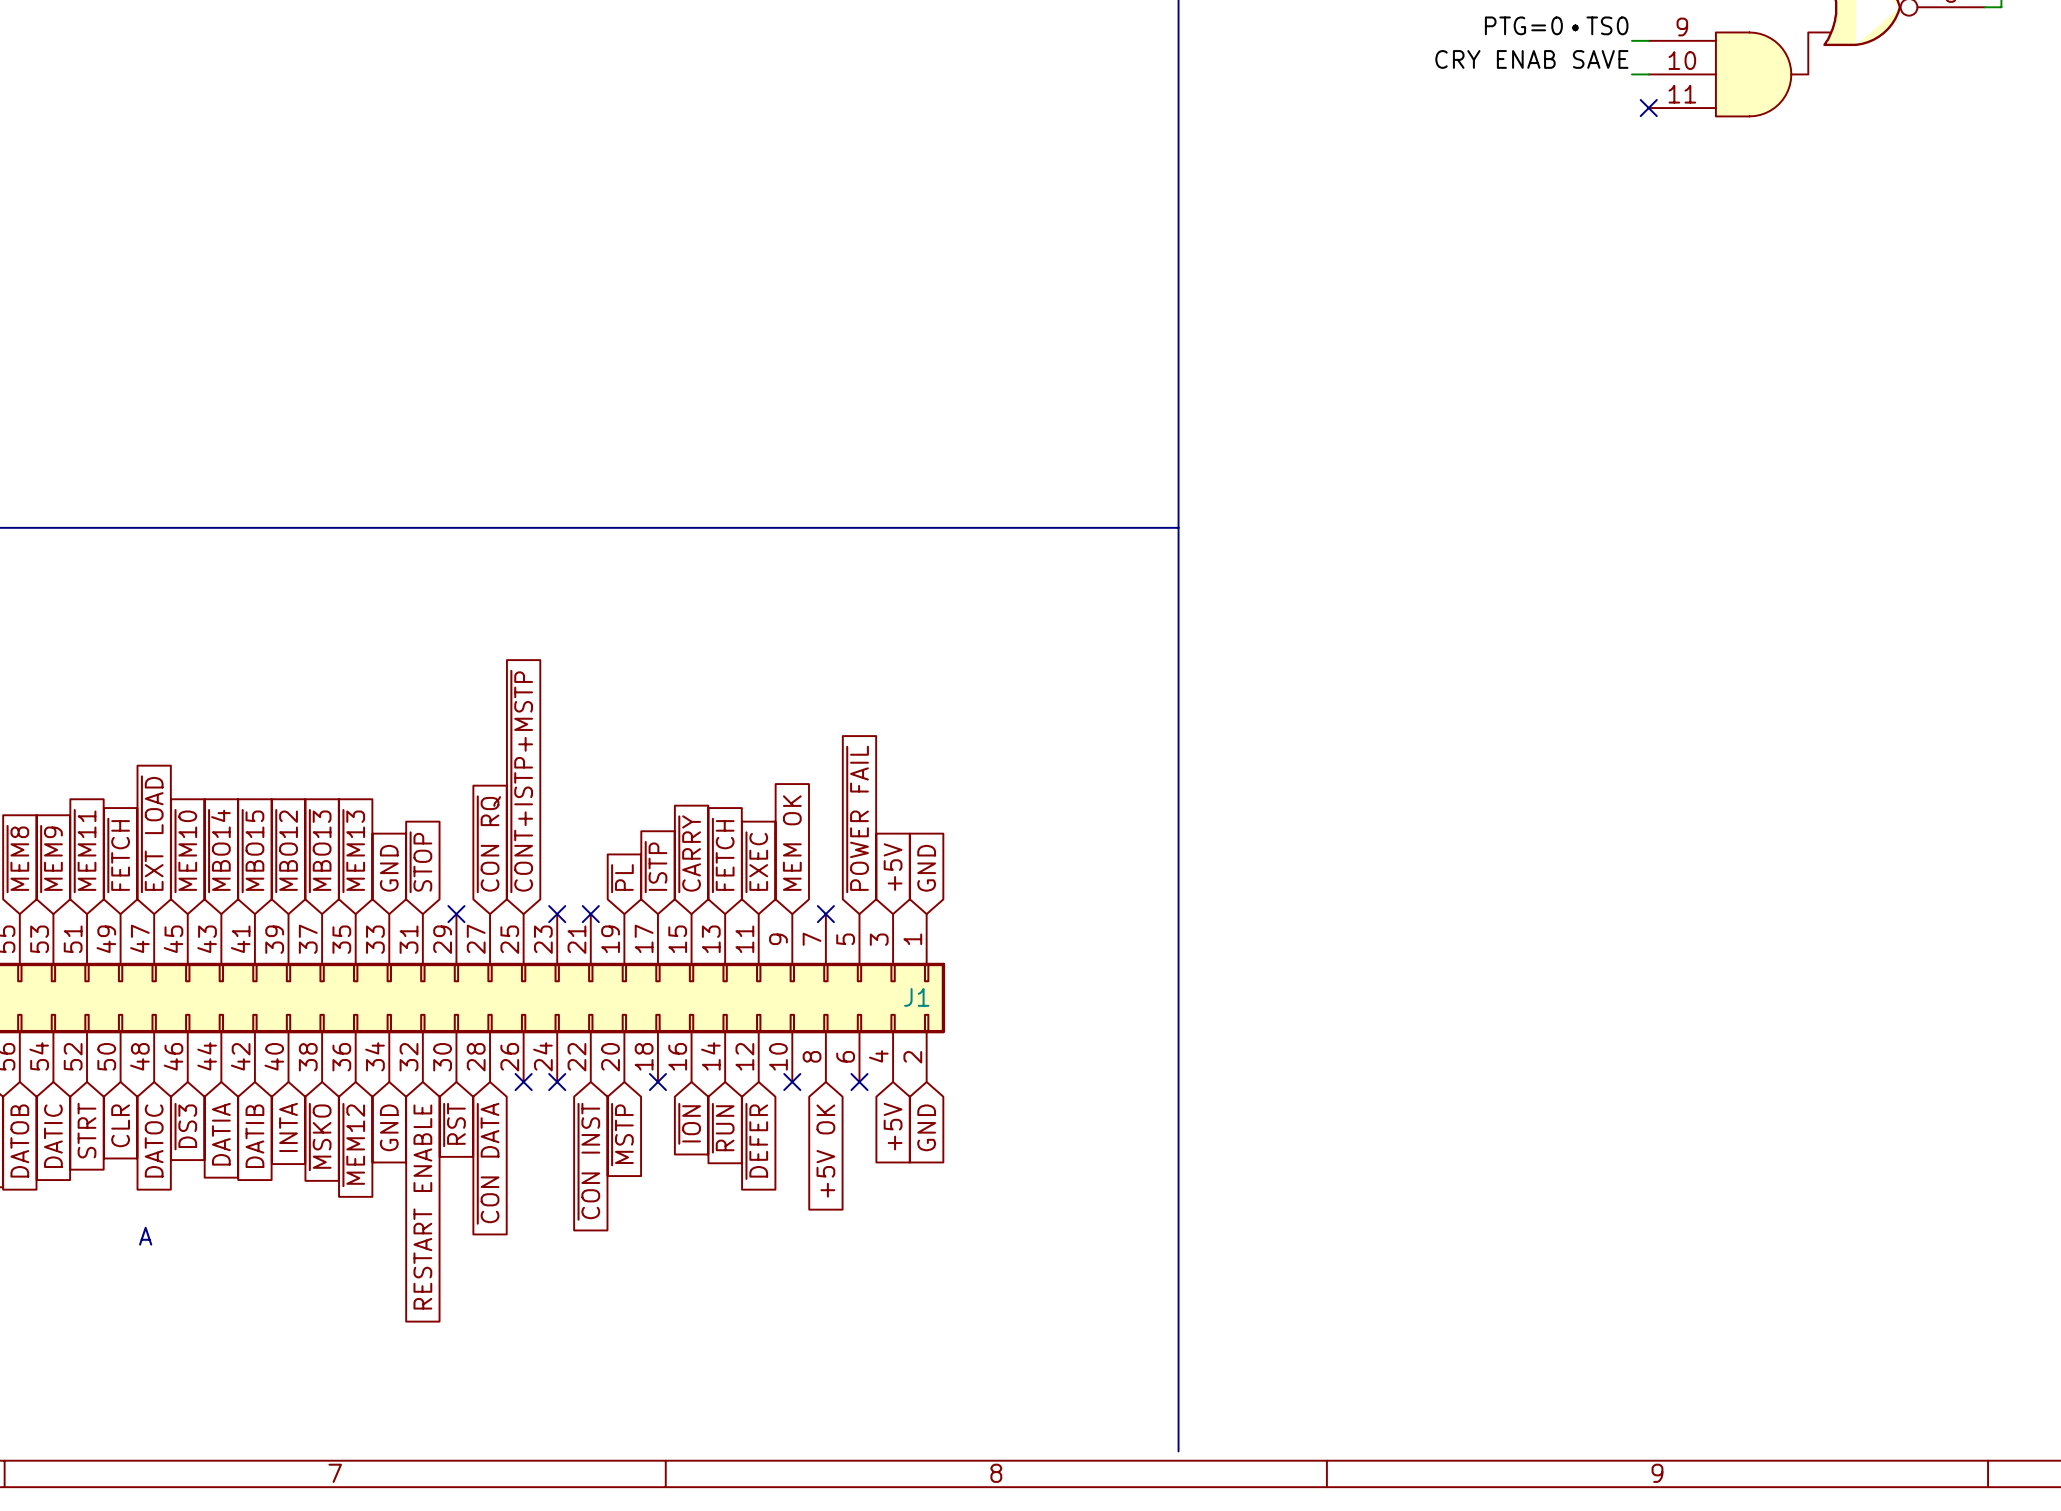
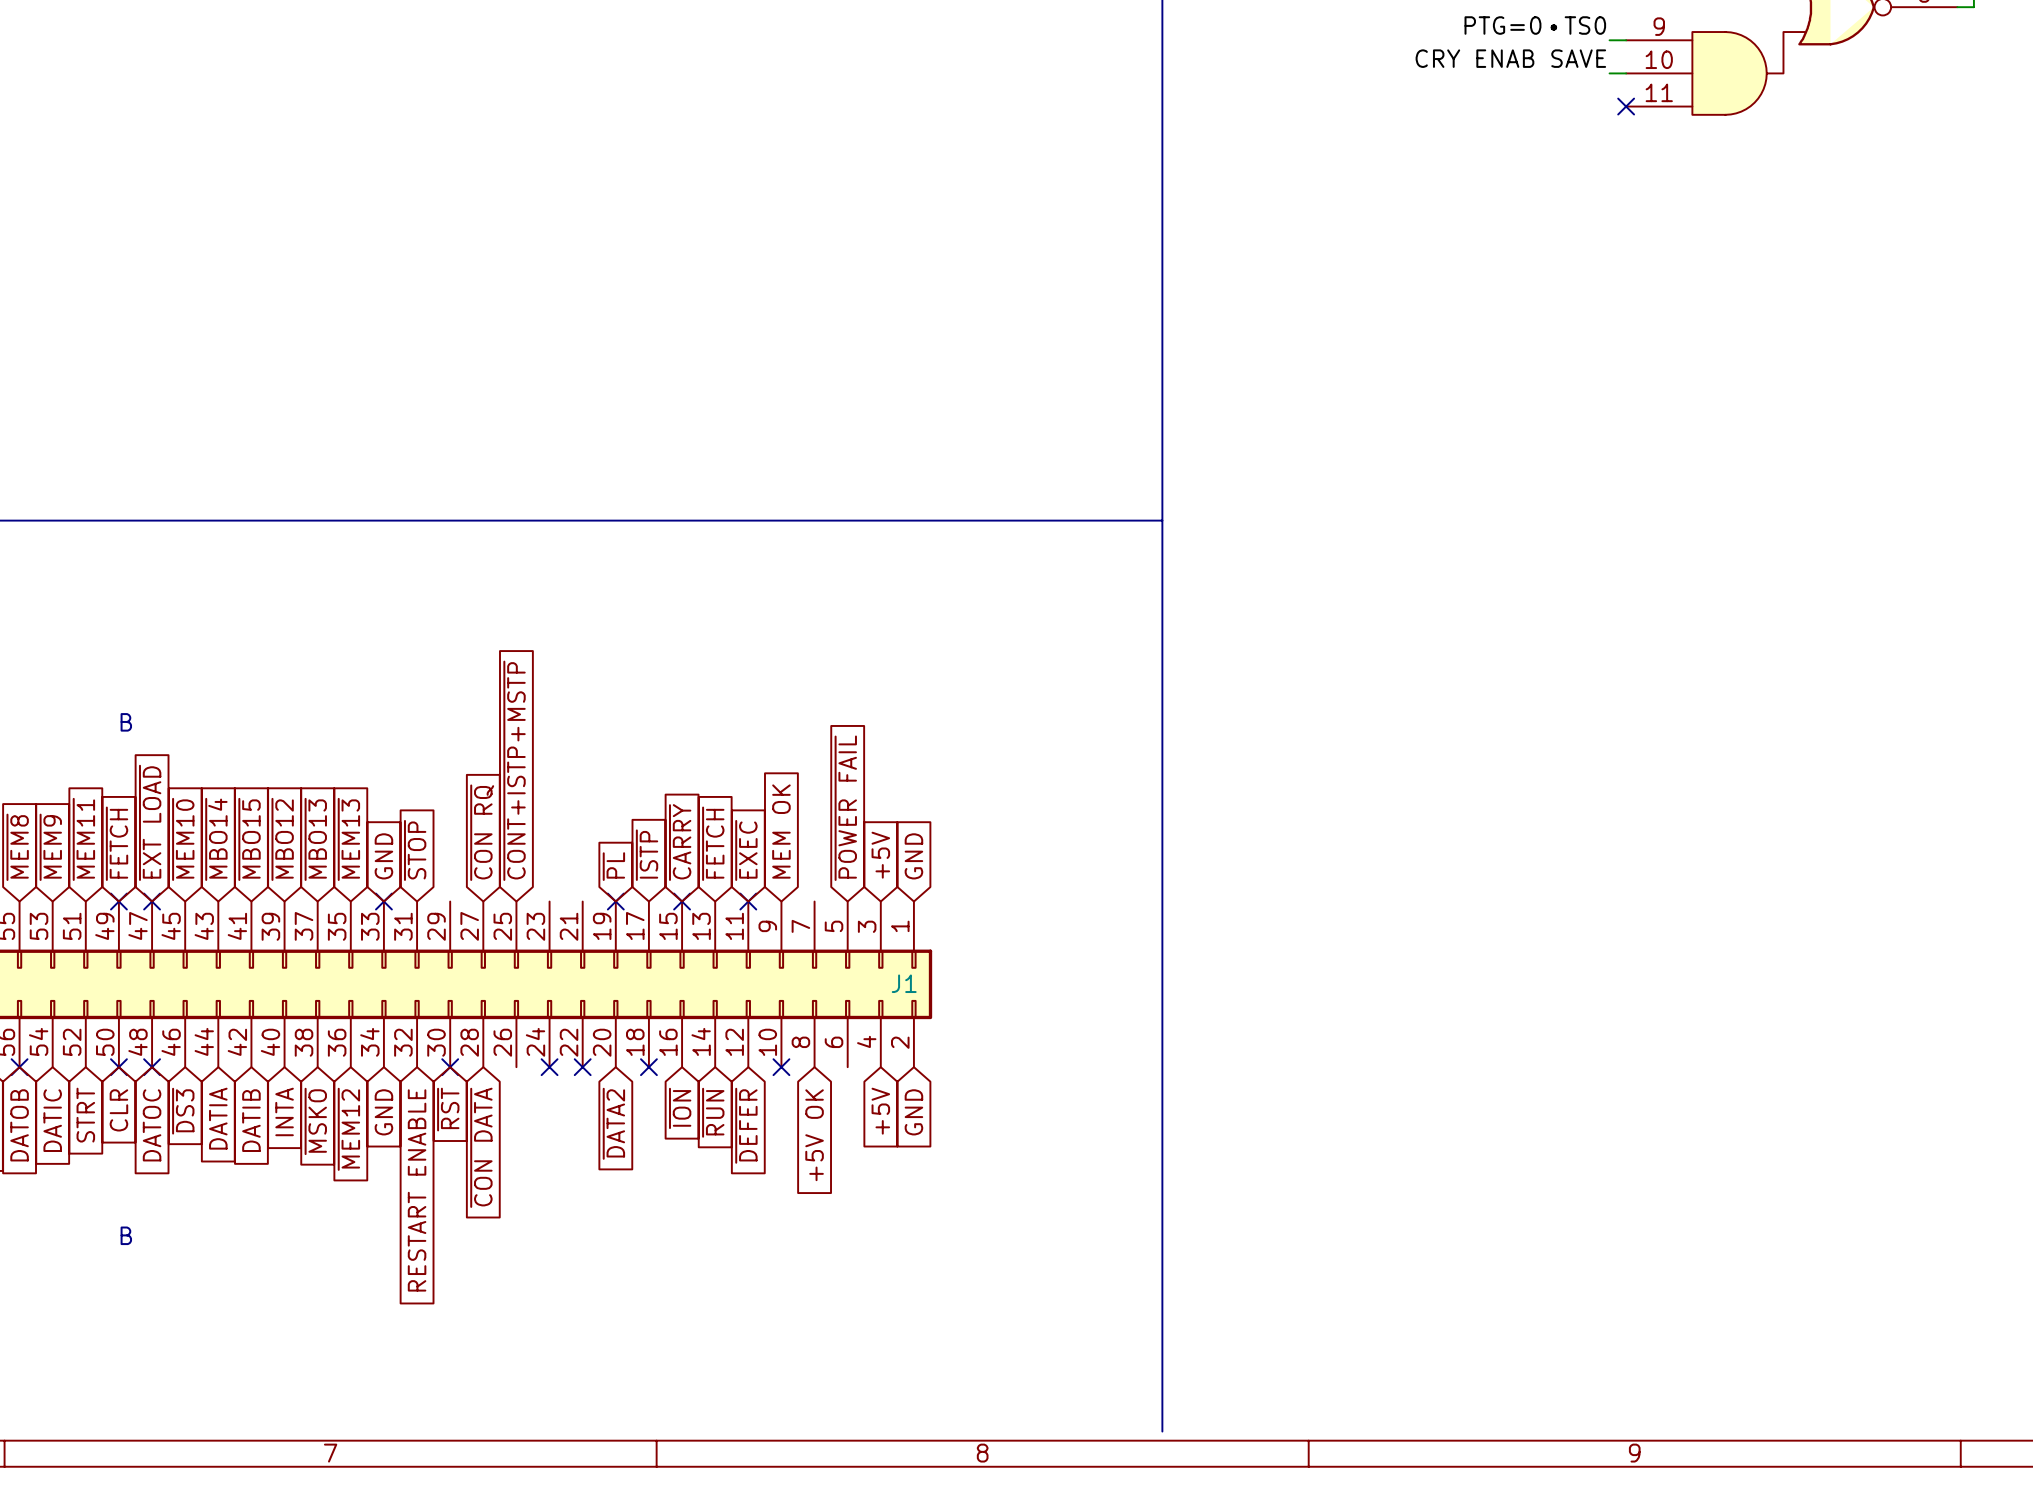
text: none -> B (126, 722)
no-connect mark: none -> (118, 901)
no-connect mark: none -> (152, 901)
no-connect mark position: (456, 914) -> (383, 901)
no-connect mark: (557, 914) -> none
no-connect mark: (590, 914) -> none
no-connect mark: none -> (615, 901)
no-connect mark: none -> (682, 901)
no-connect mark: none -> (748, 901)
no-connect mark: (825, 914) -> none
no-connect mark: none -> (19, 1067)
no-connect mark: none -> (118, 1067)
no-connect mark: none -> (152, 1067)
no-connect mark: none -> (450, 1067)
no-connect mark: (523, 1082) -> none
no-connect mark: none -> (582, 1067)
no-connect mark: (859, 1082) -> none
global label: ~{MSTP} (622, 1134) -> ~{DATA2} (613, 1123)
global label: ~{CON INST} (588, 1161) -> none
text: A (145, 1236) -> none
text: none -> B (126, 1235)

